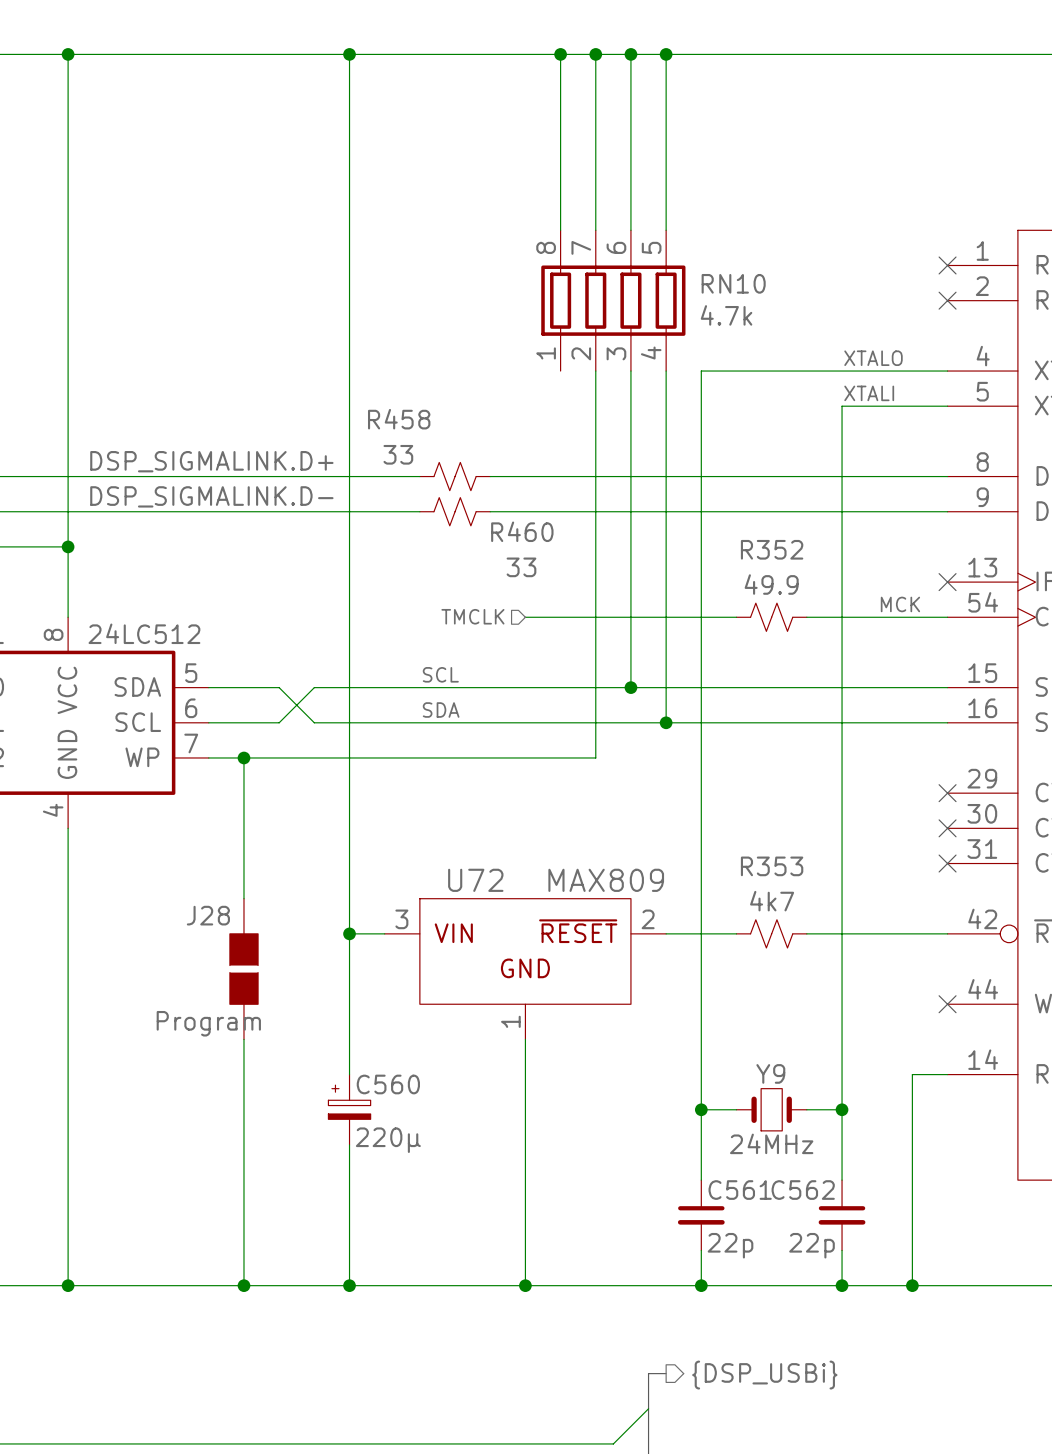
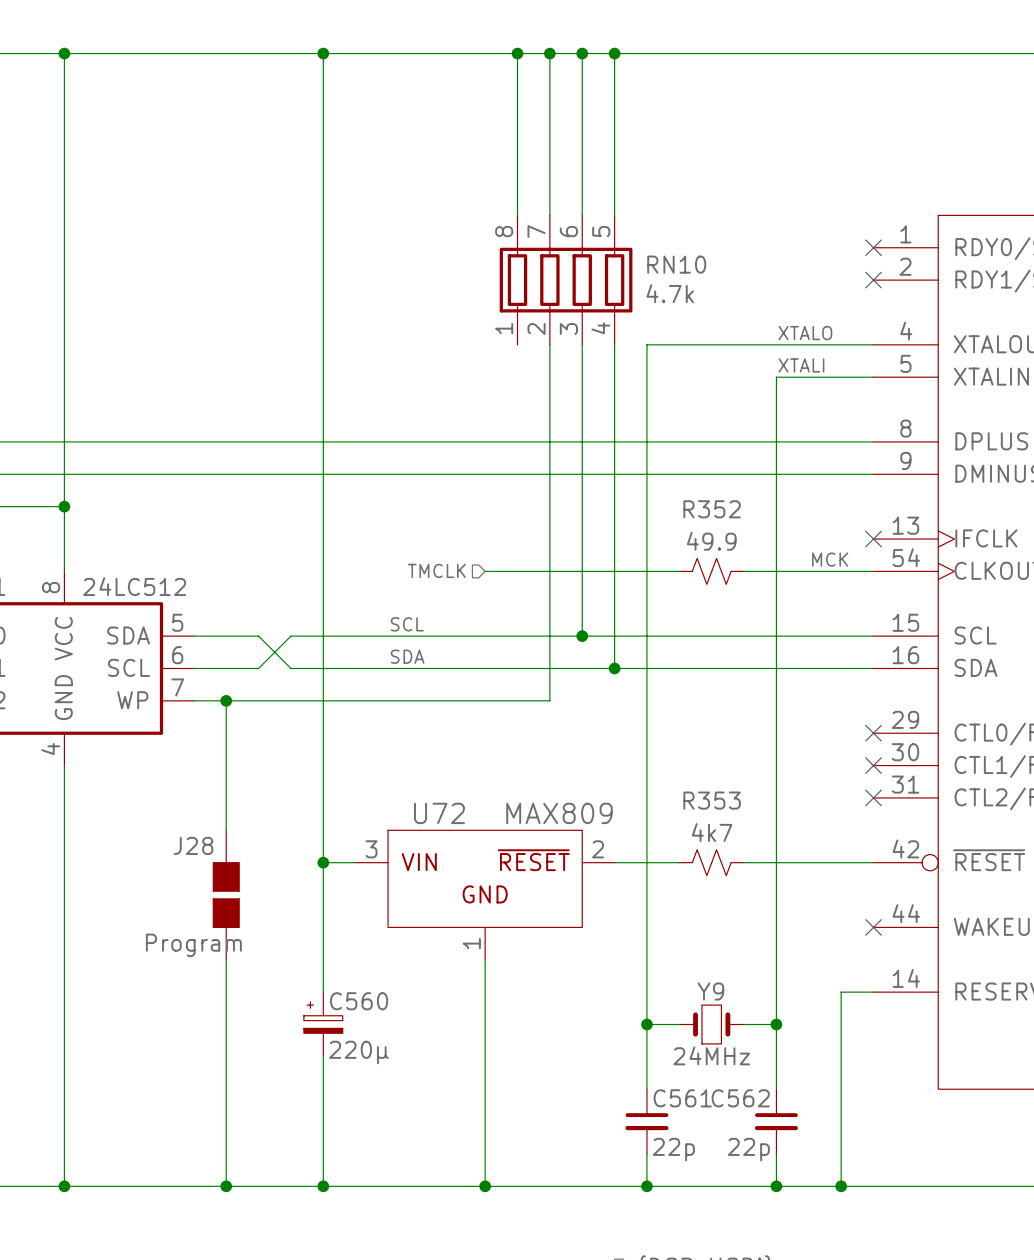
label: DSP_SIGMALINK.D+ (211, 461) -> none
wire: none -> (388, 441) (452, 441)
R458: 33 (455, 476) -> none
label: DSP_SIGMALINK.D- (211, 496) -> none
wire: none -> (388, 474) (452, 474)
R460: 33 (455, 511) -> none

